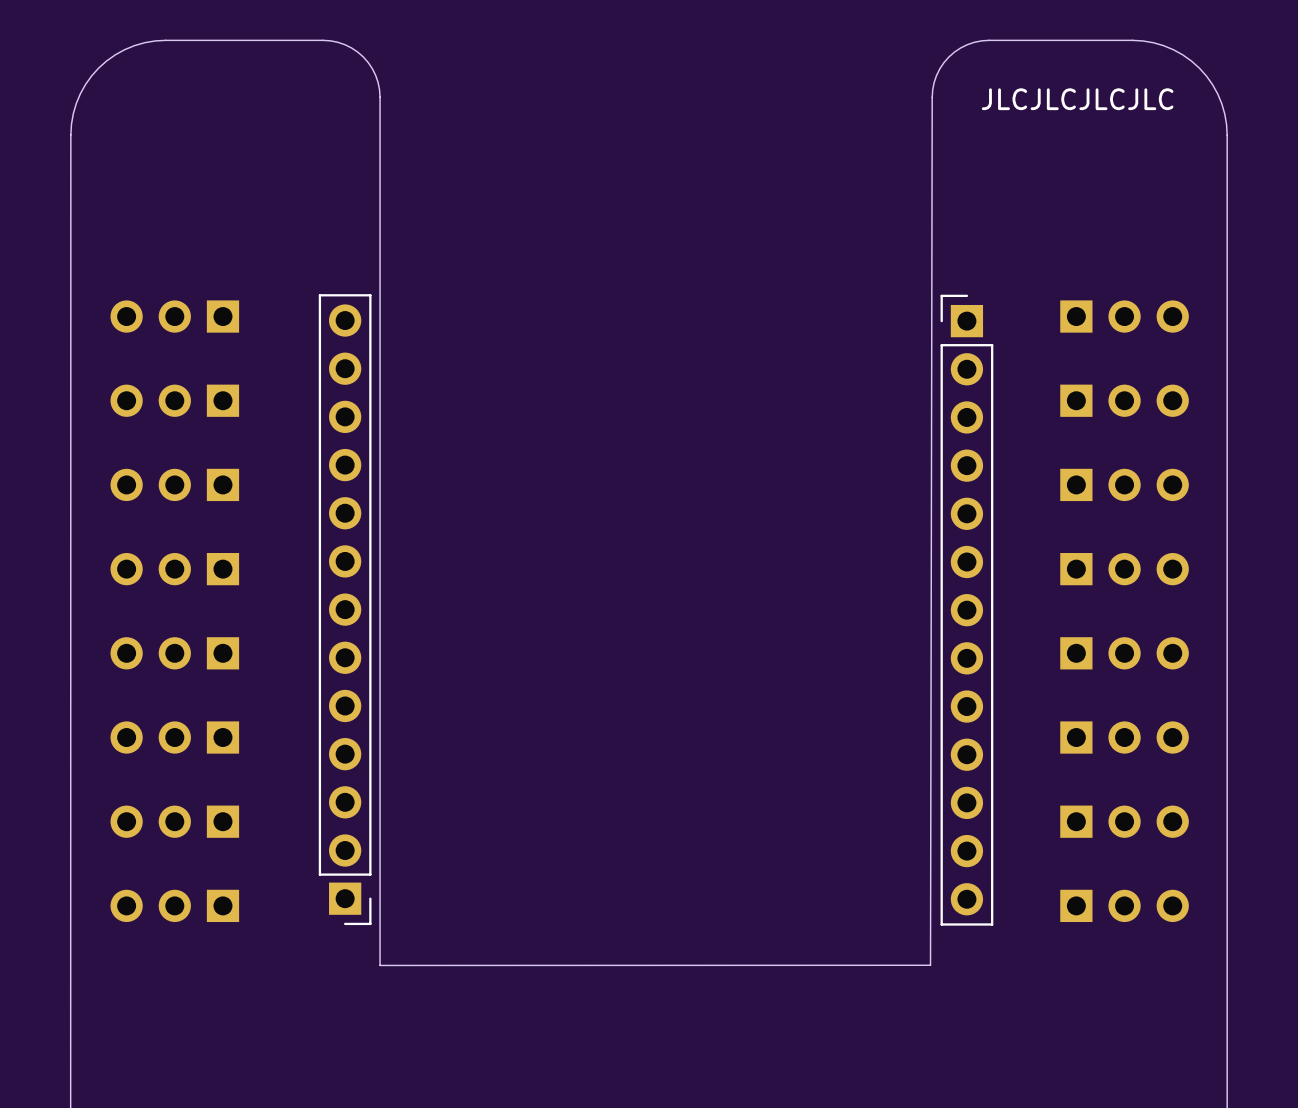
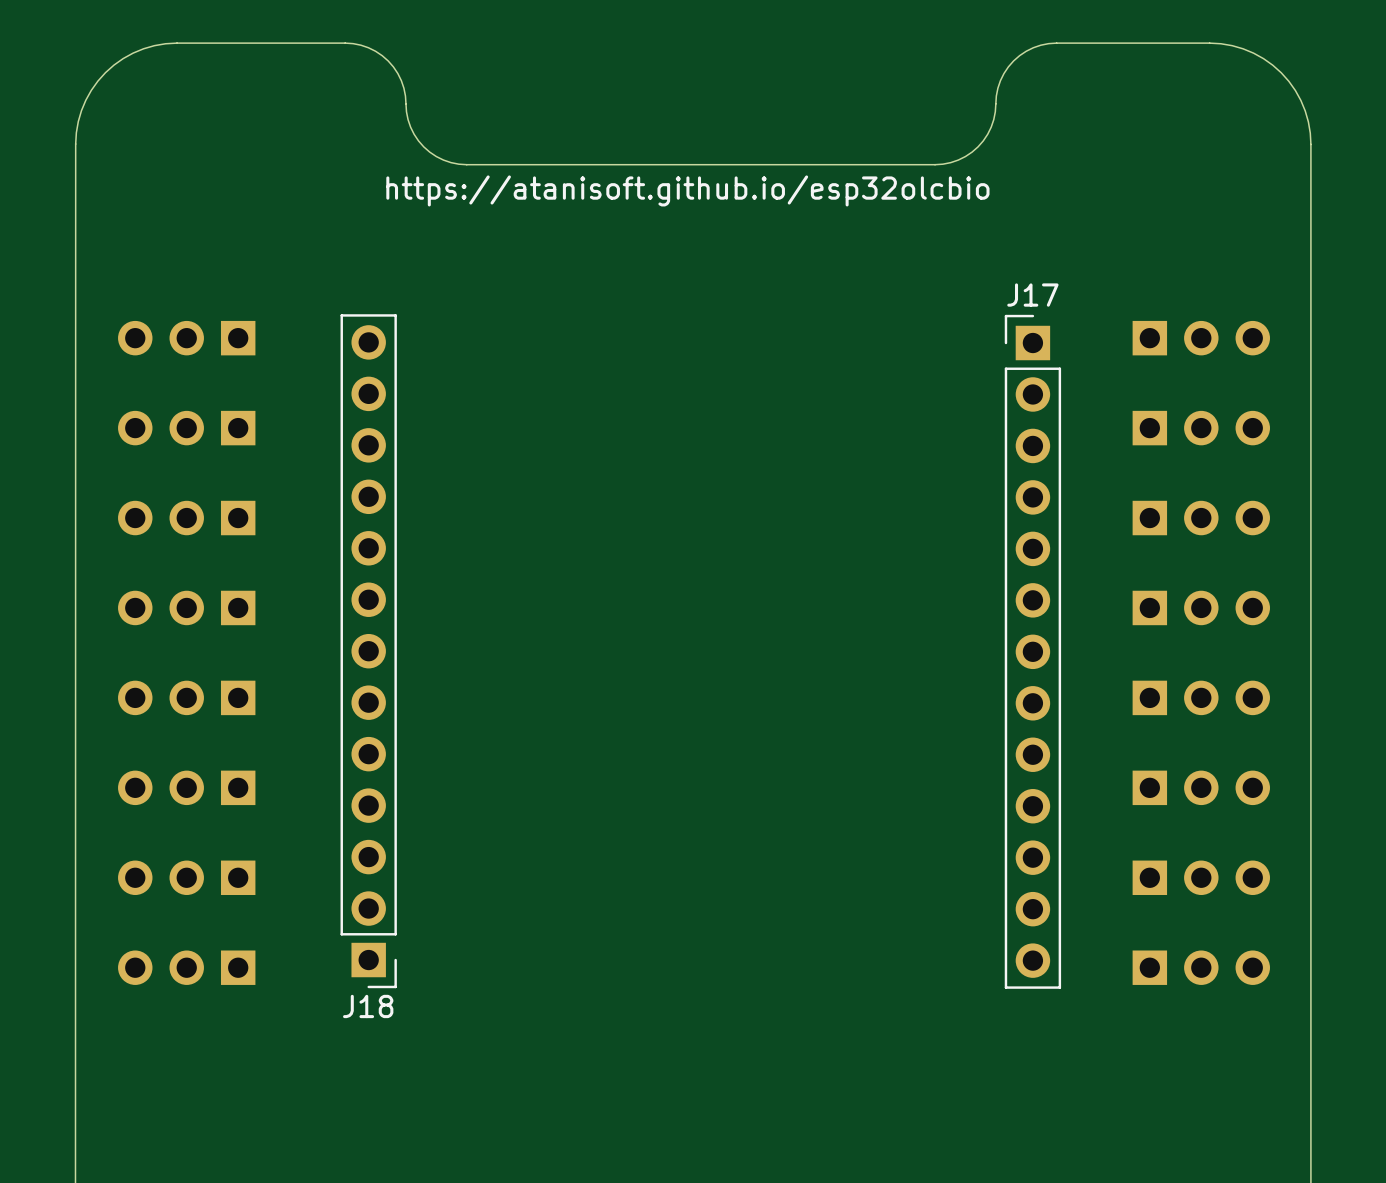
board edge: (932, 97) (930, 965) (380, 965) (380, 97) -> (995, 103) (991, 127) (978, 146) (958, 160) (935, 164) (458, 164) (436, 156) (418, 140) (410, 127) (405, 103)
text: JLCJLCJLCJLC (1077, 99) -> none
text: none -> https://atanisoft.github.io/esp32olcbio (687, 190)
J17 name: none -> J17 (1032, 295)
J18 name: none -> J18 (368, 1006)

